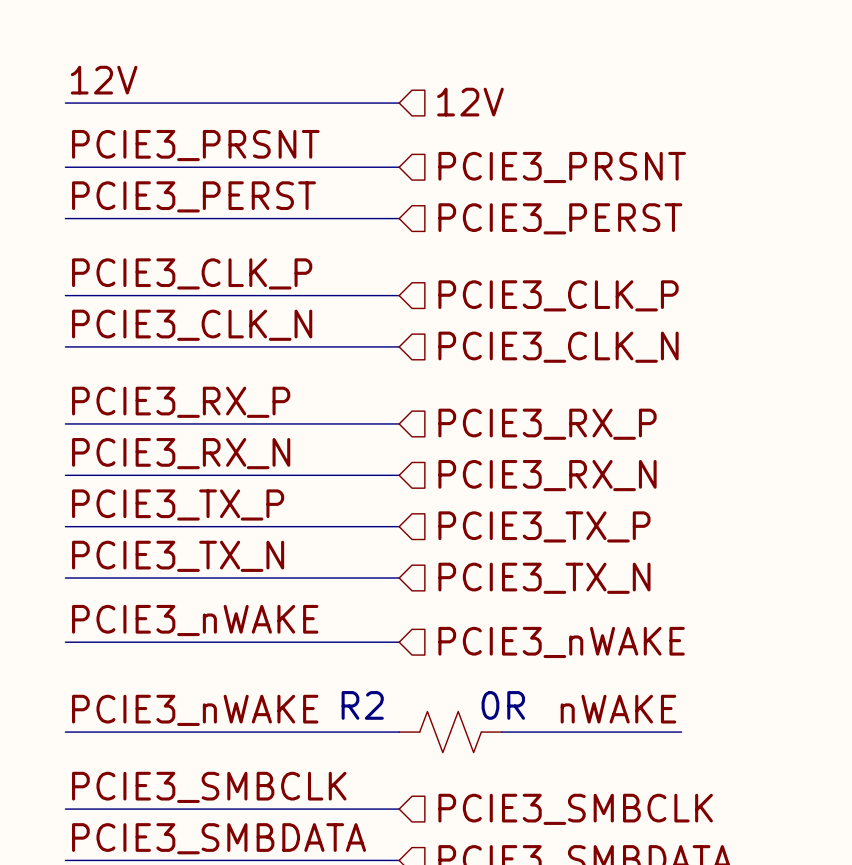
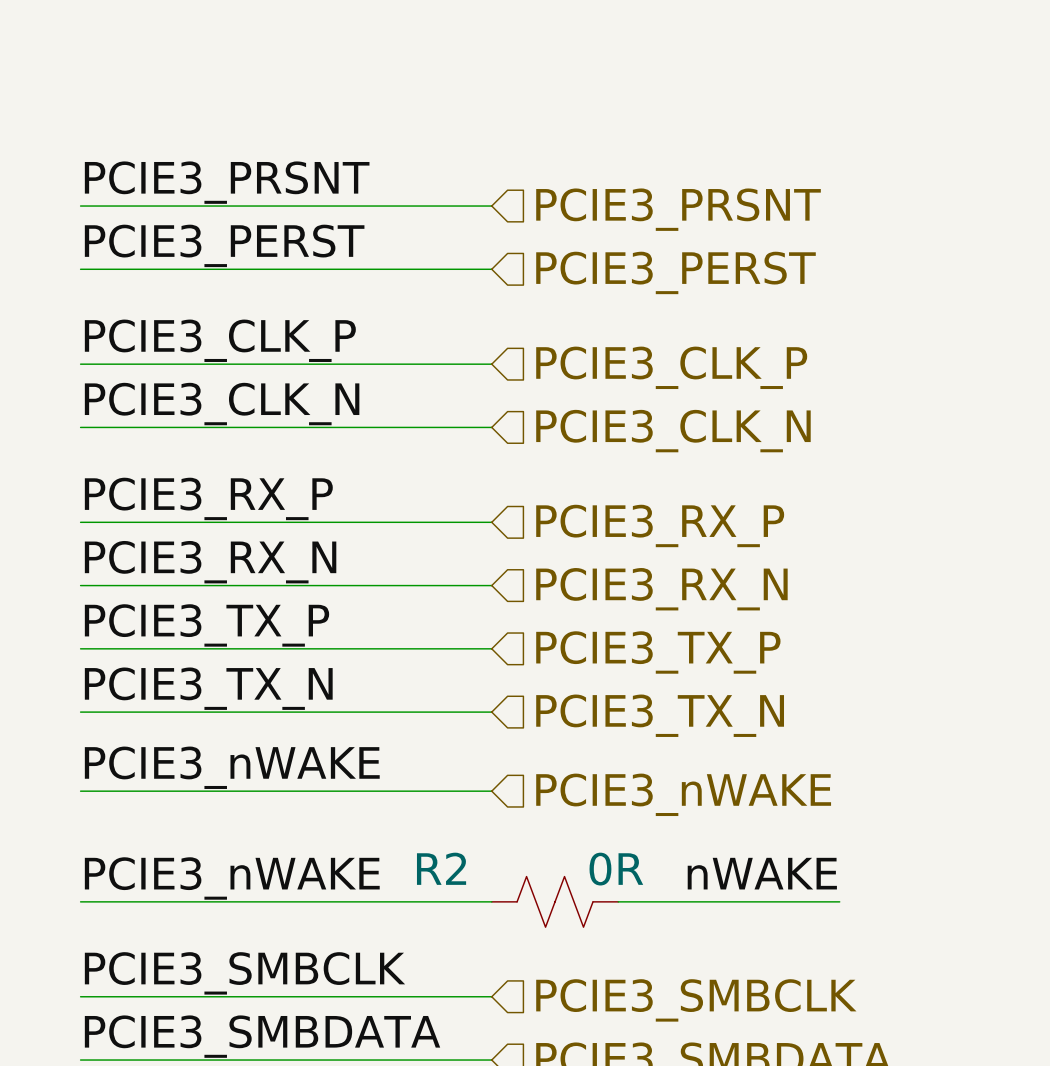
label: 12V (104, 80) -> none
hierarchical label: 12V (470, 102) -> none
wire: (65, 103) (399, 103) -> none

